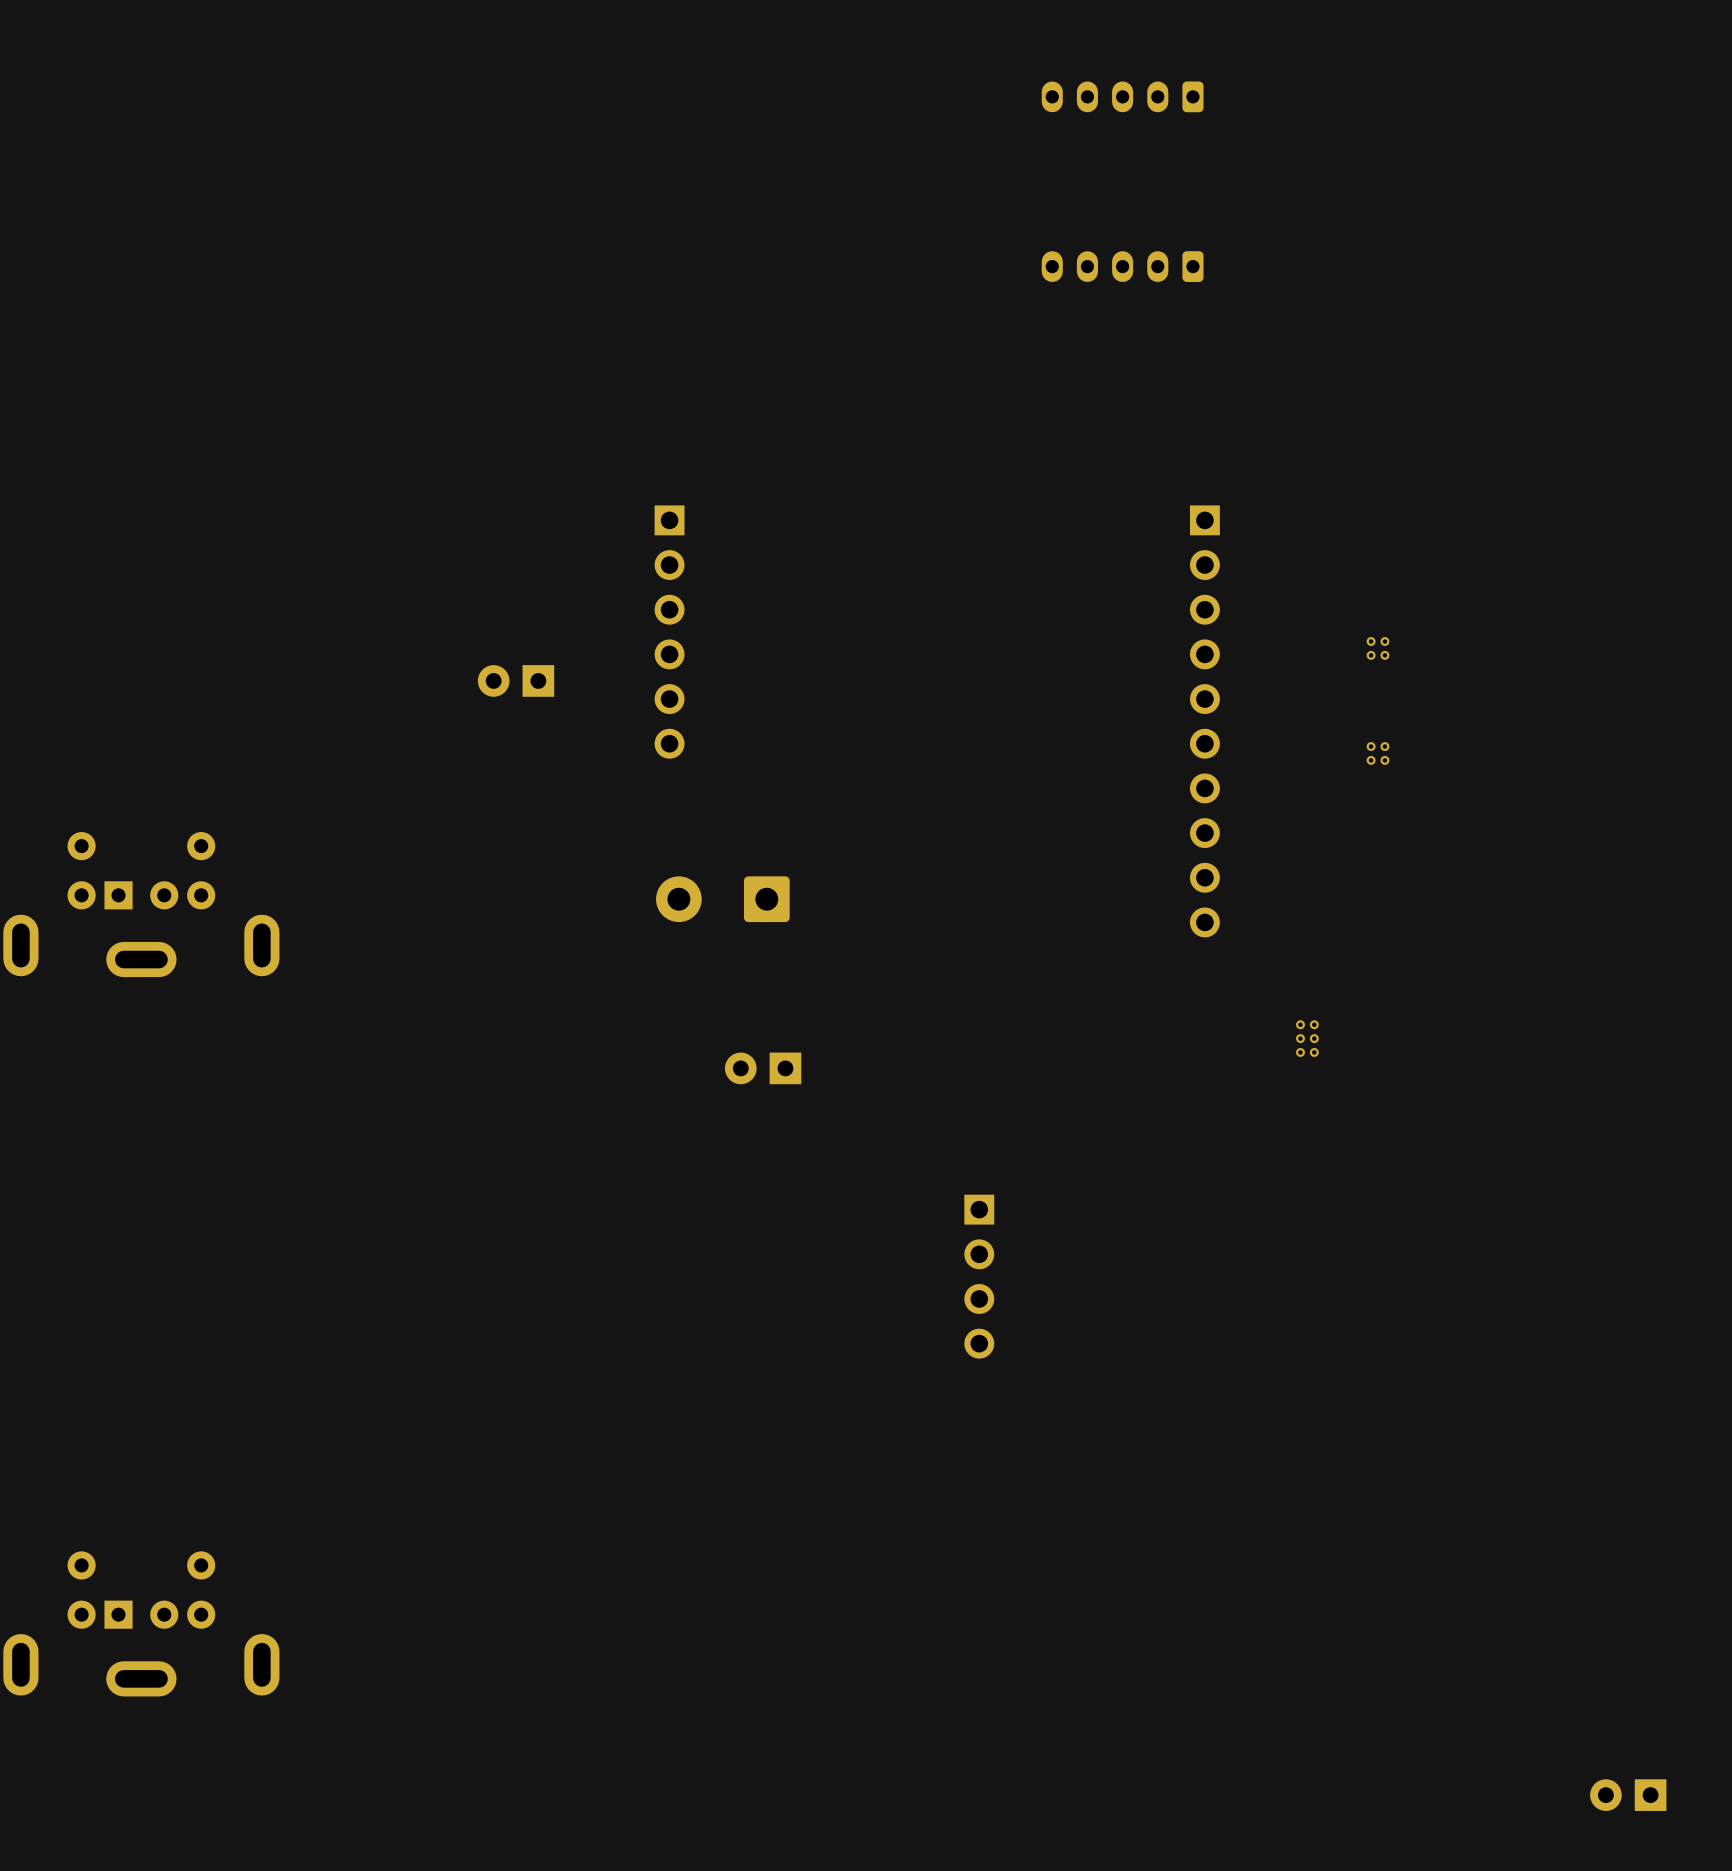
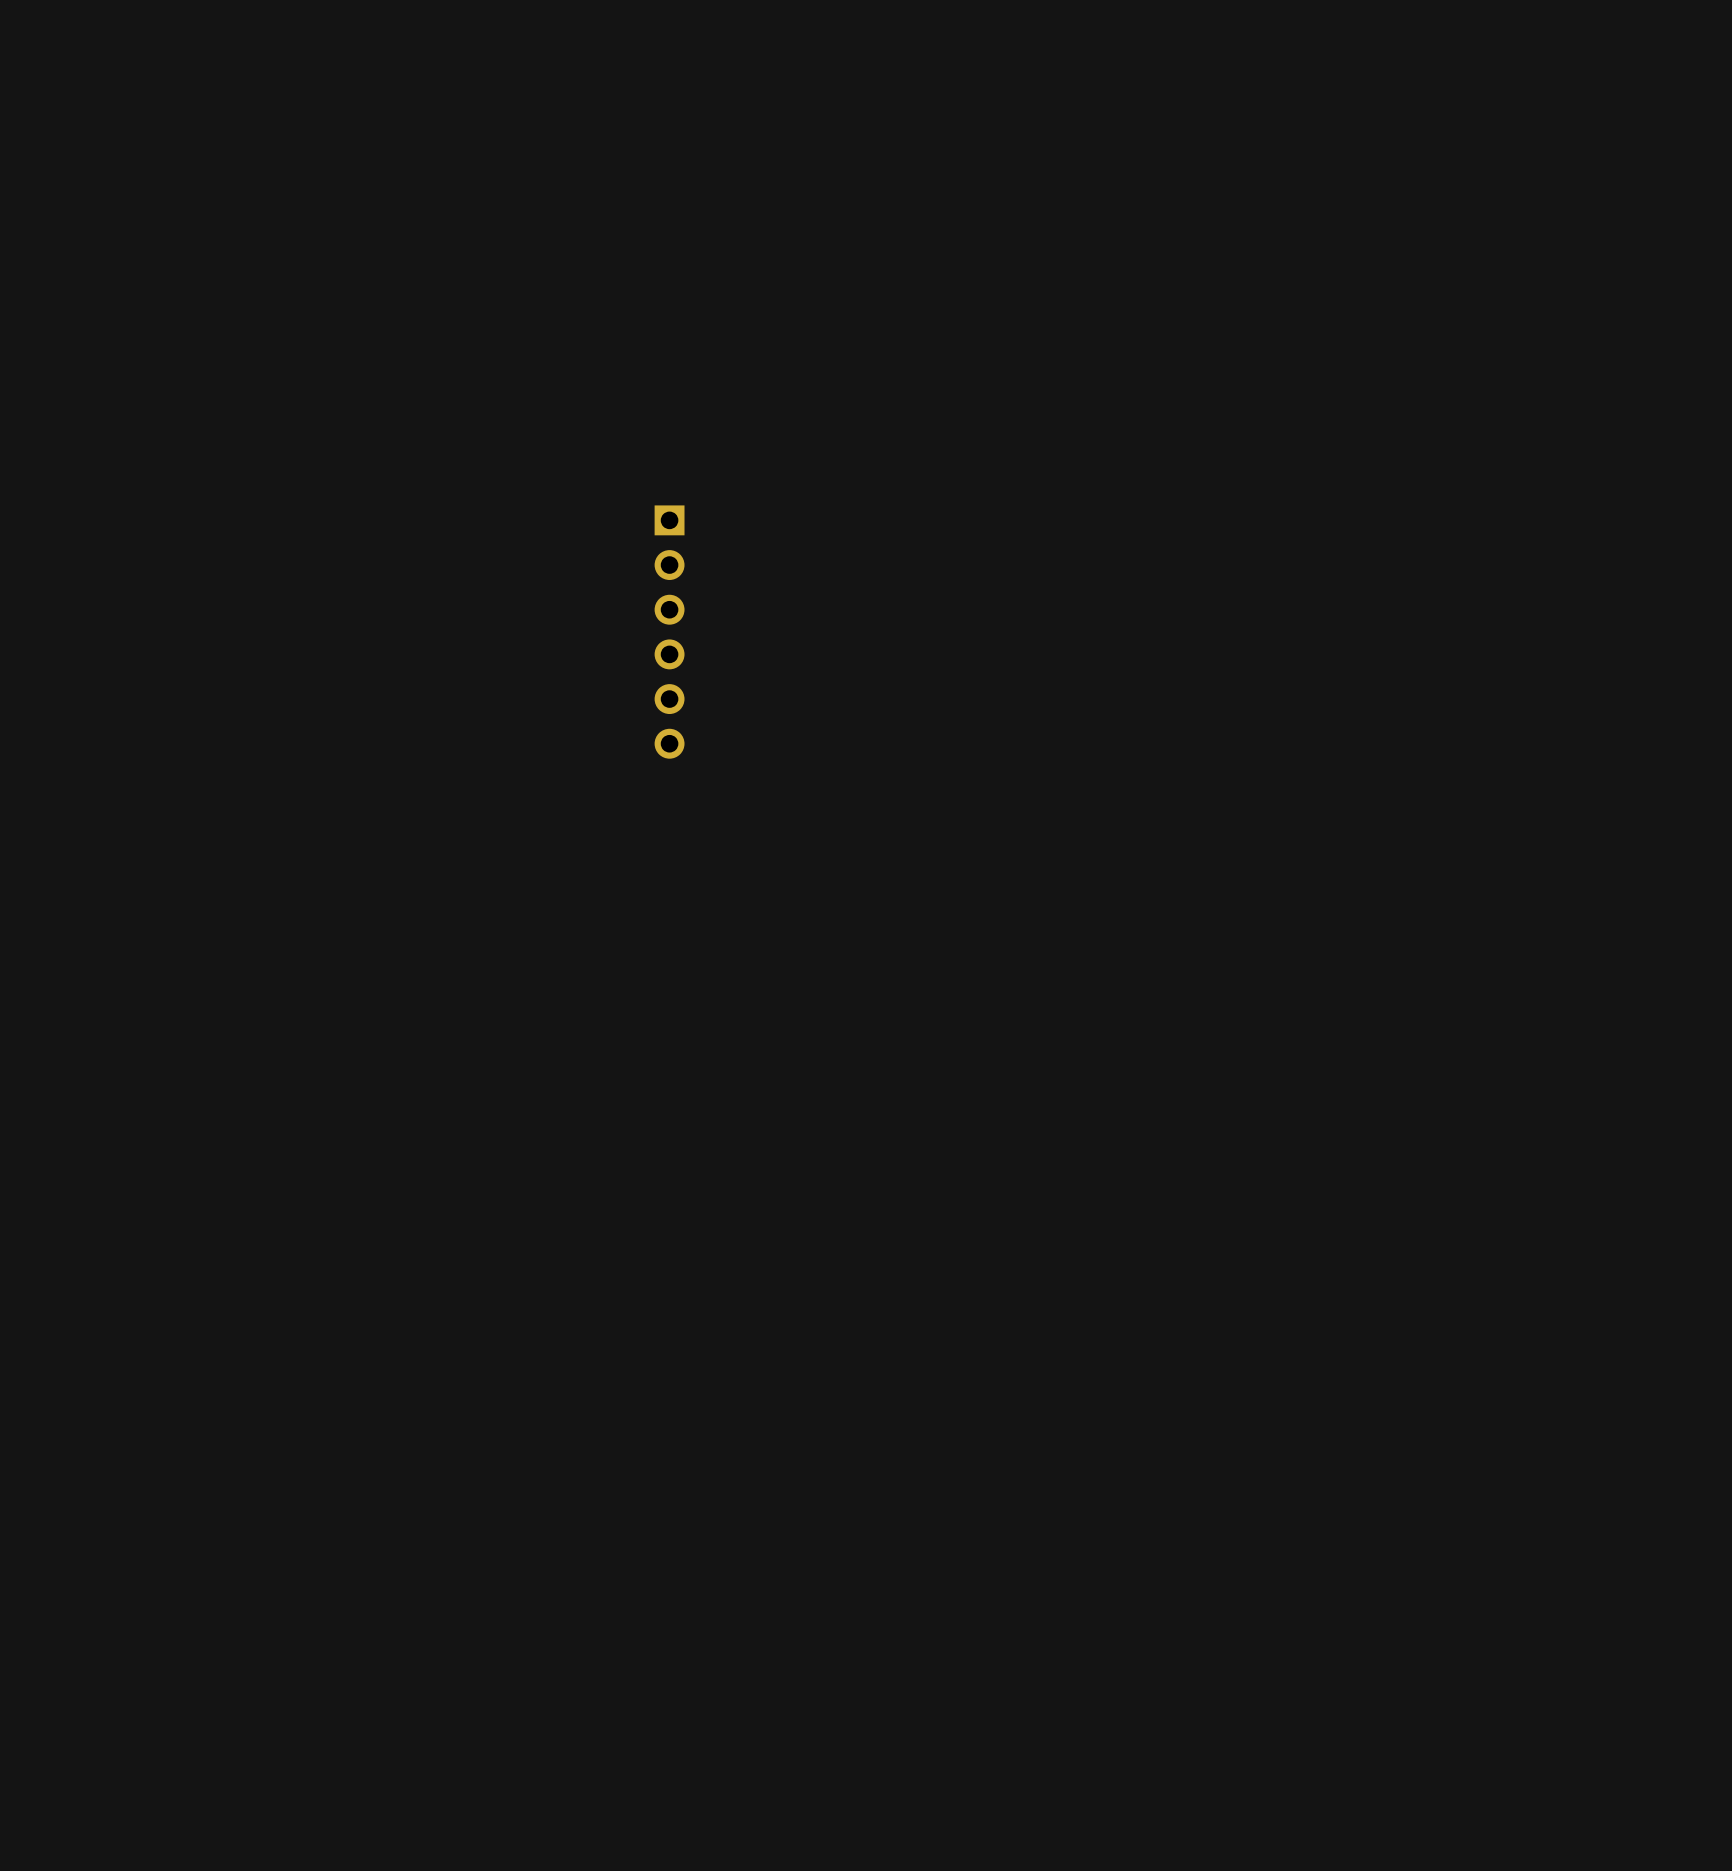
part: (1122, 96) -> none
part: (1122, 266) -> none
part: (1378, 648) -> none
part: (516, 680) -> none
part: (1204, 721) -> none
part: (1378, 753) -> none
part: (722, 899) -> none
part: (141, 904) -> none
part: (1307, 1038) -> none
part: (763, 1068) -> none
part: (979, 1276) -> none
part: (141, 1623) -> none
part: (1628, 1795) -> none

